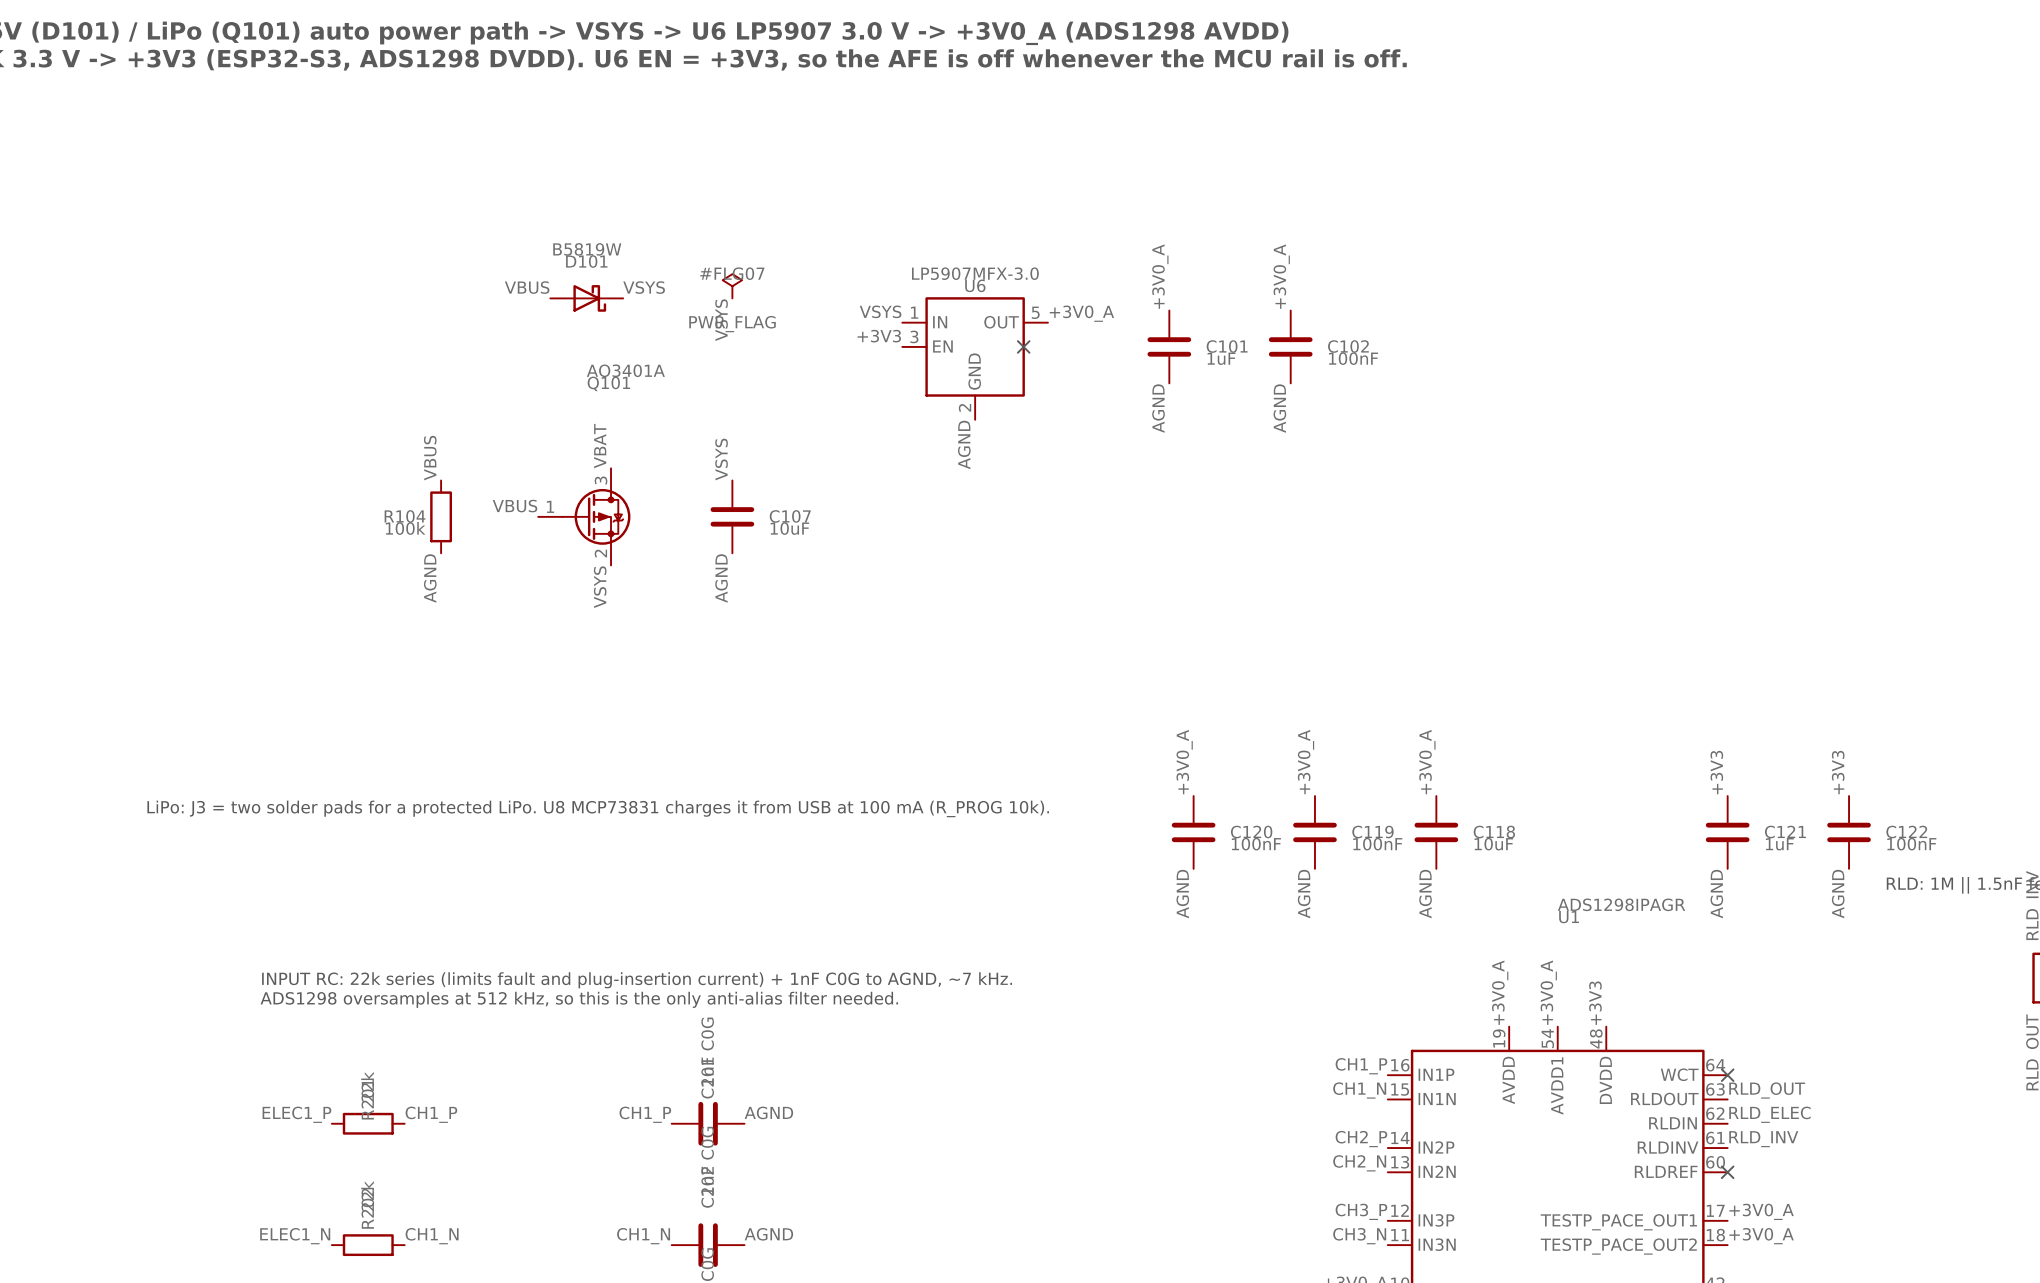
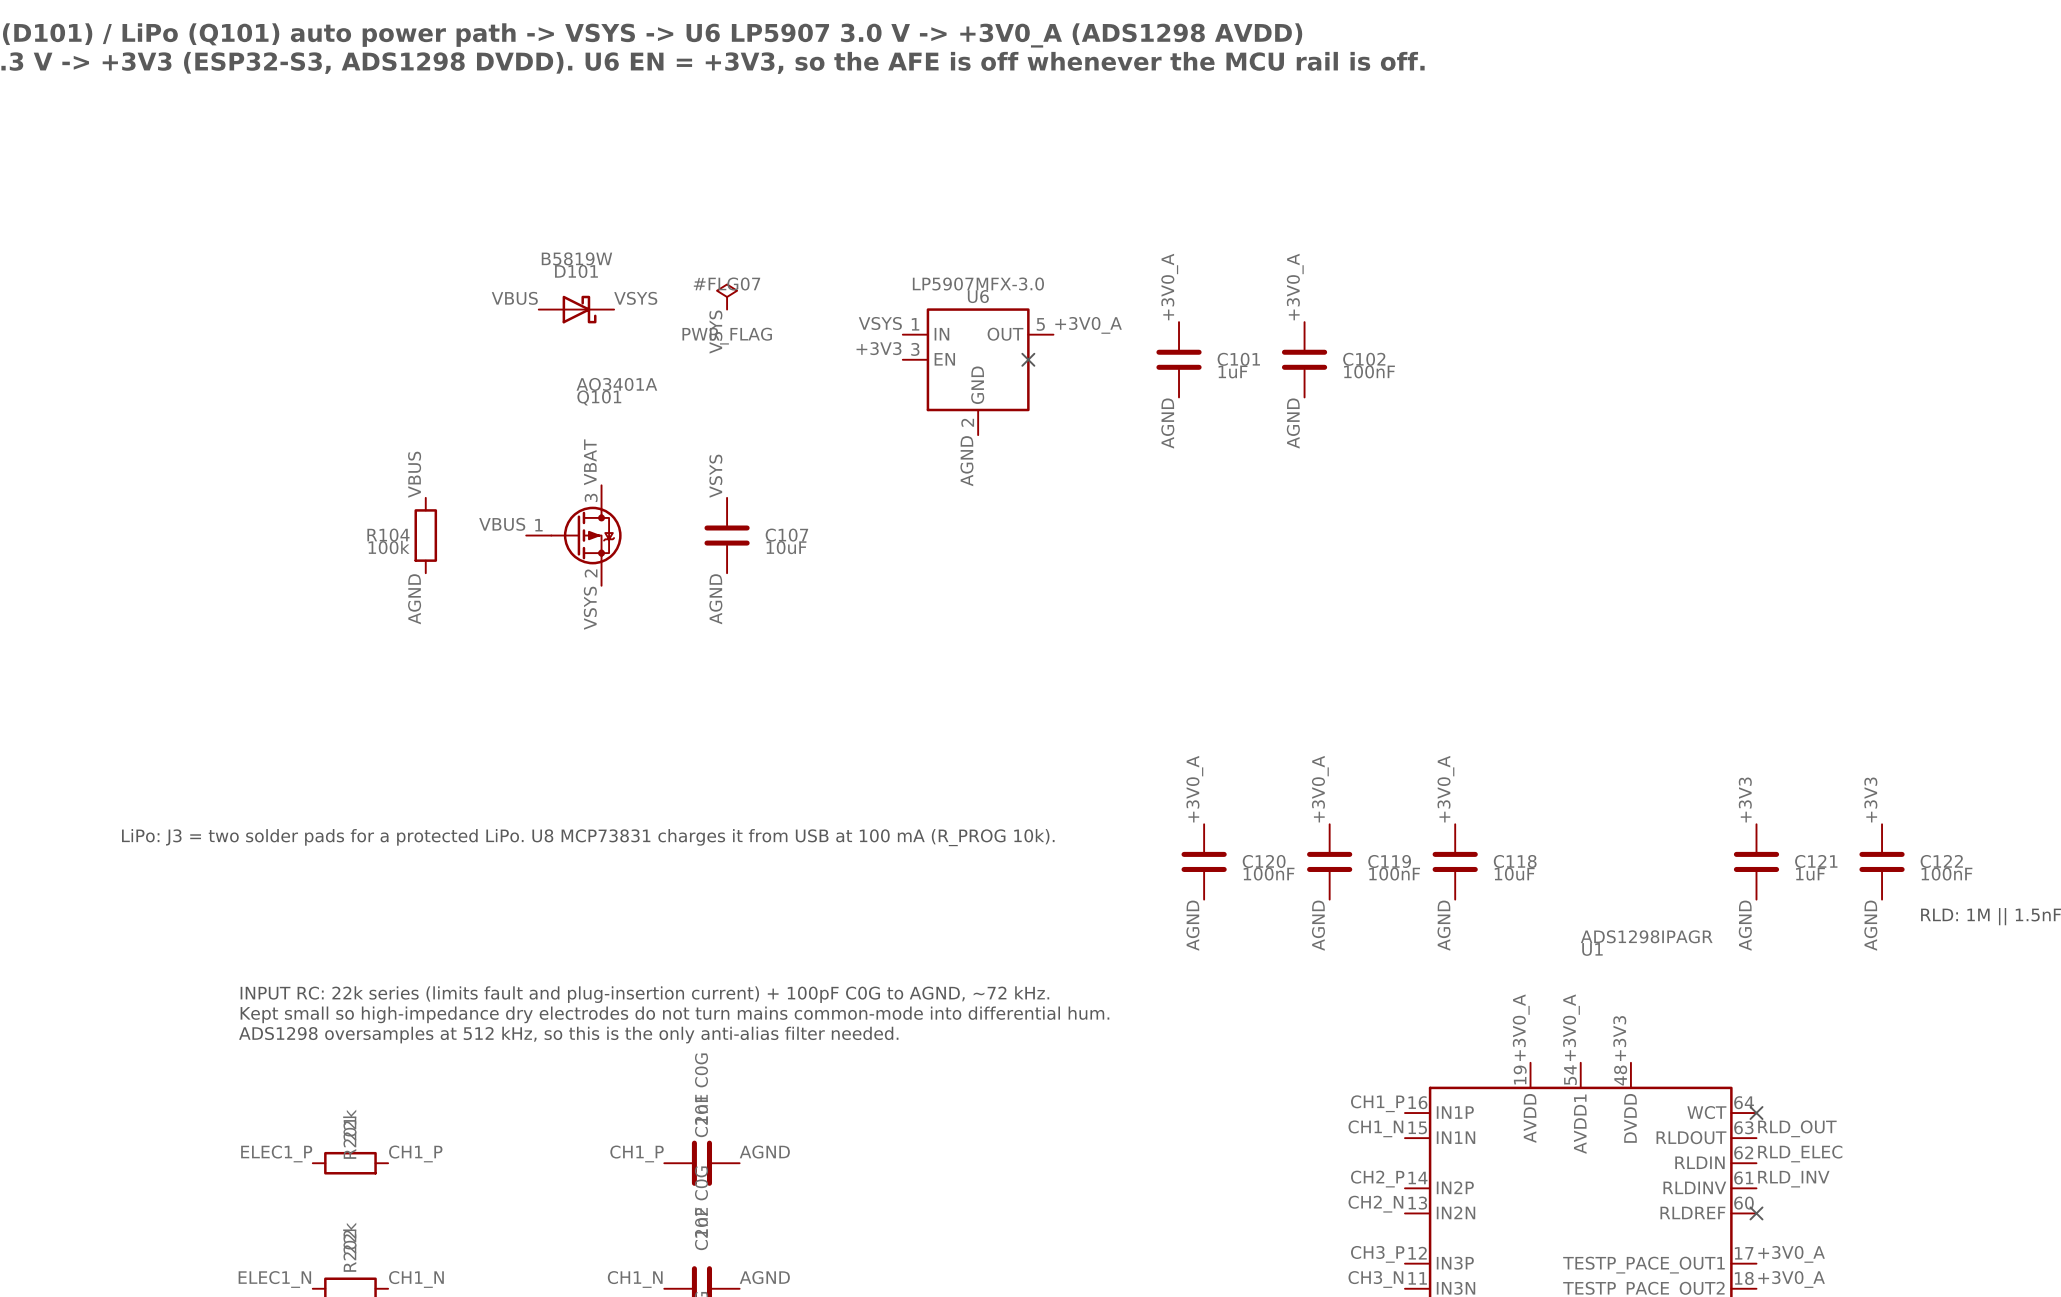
text: none -> INPUT RC: 22k series (limits fault and plug-insertion current) + 100pF C0G to AGND, ~72 kHz. (644, 994)
text: INPUT RC: 22k series (limits fault and plug-insertion current) + 1nF C0G to AGND, ~7 kHz. (637, 980) -> Kept small so high-impedance dry electrodes do not turn mains common-mode into differential hum. (674, 1014)

